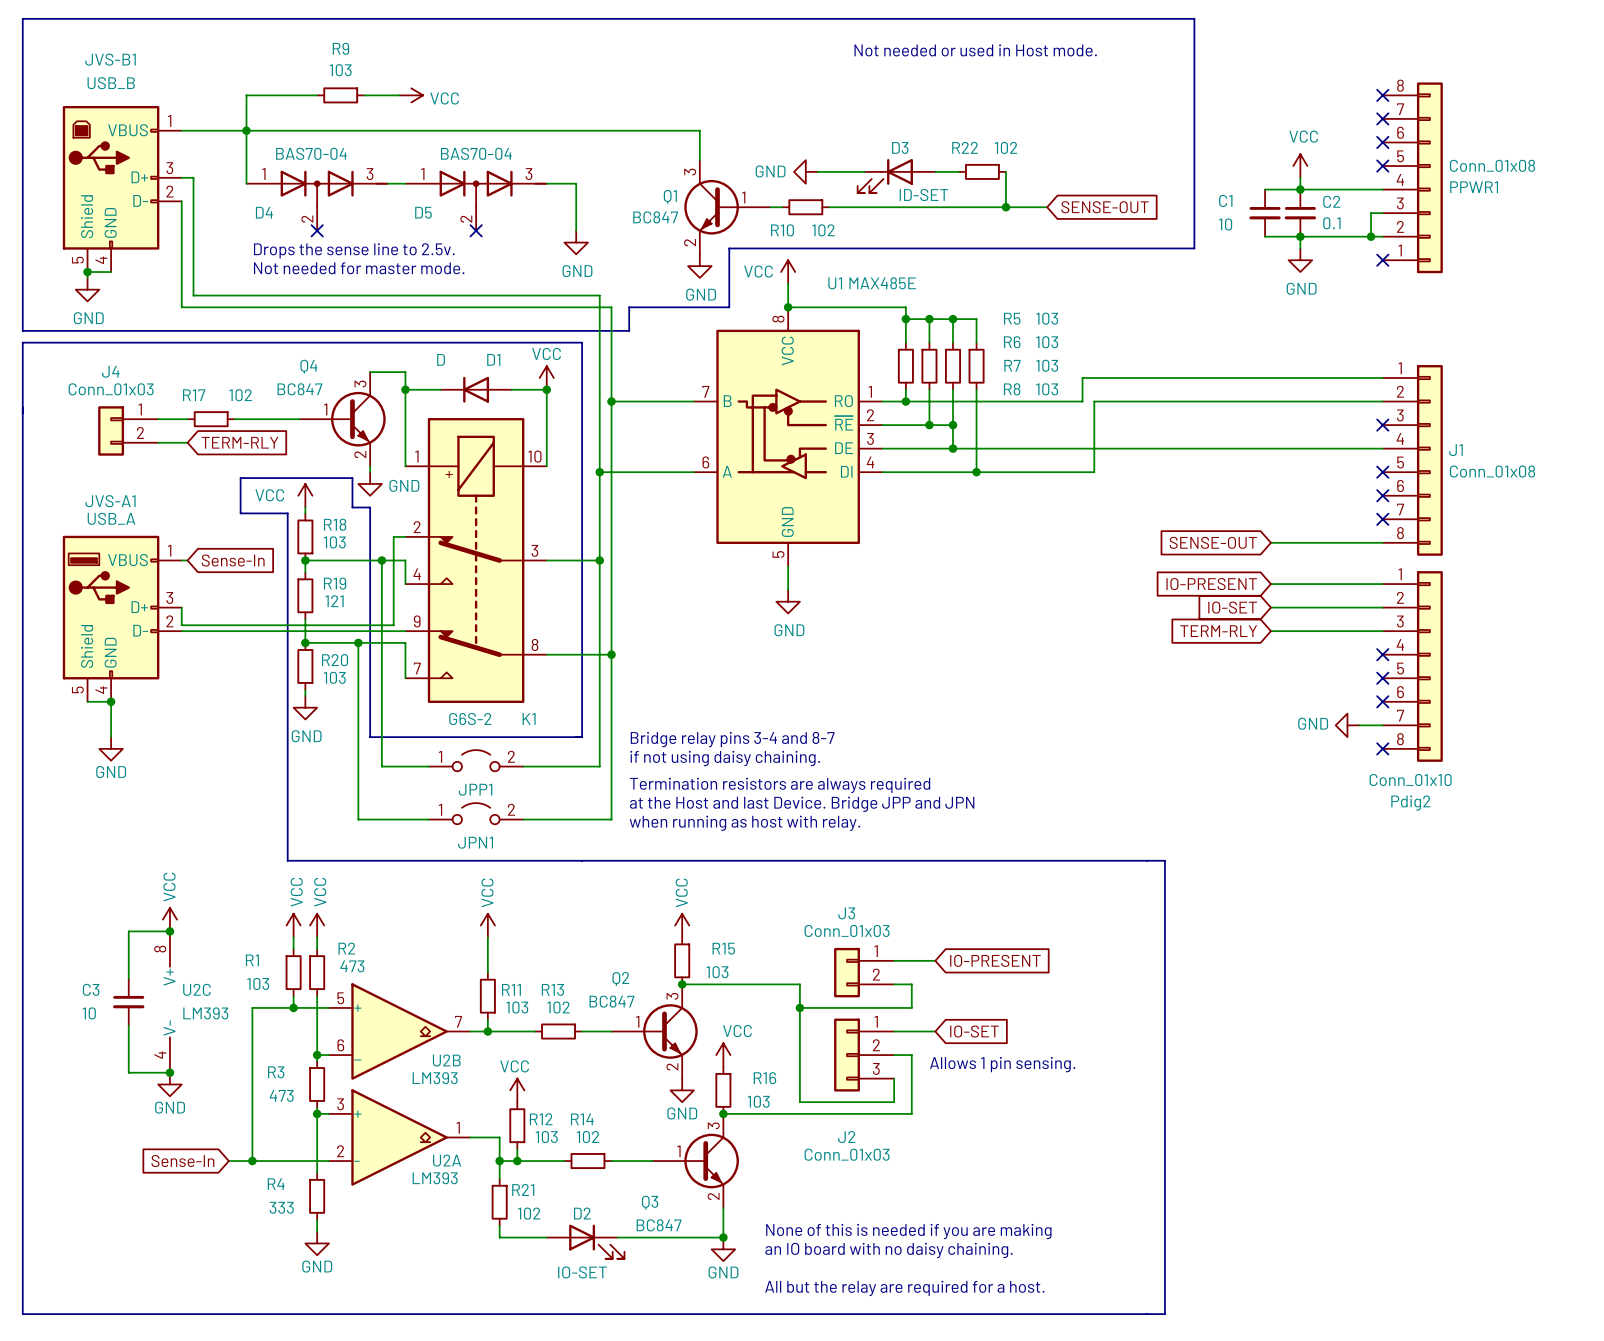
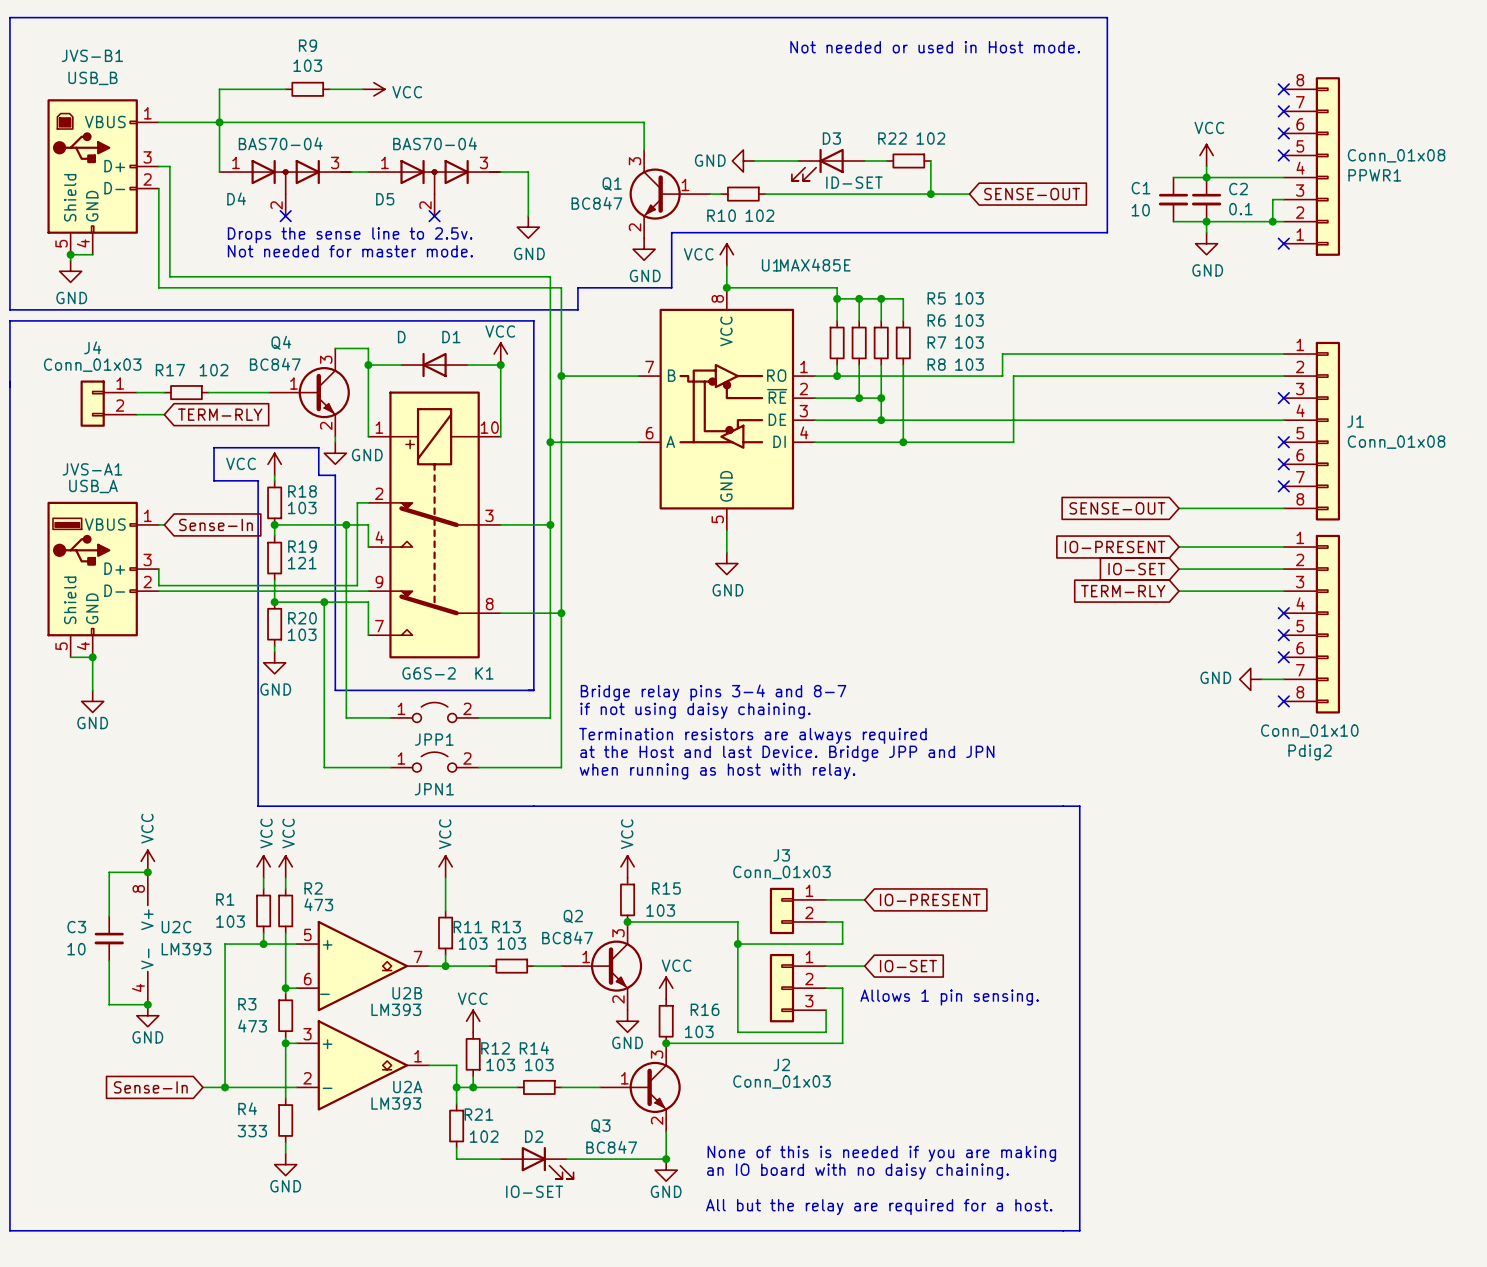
R13 value: 102 (558, 1007) -> 103 (511, 943)
R14 value: 102 (587, 1137) -> 103 (539, 1064)

